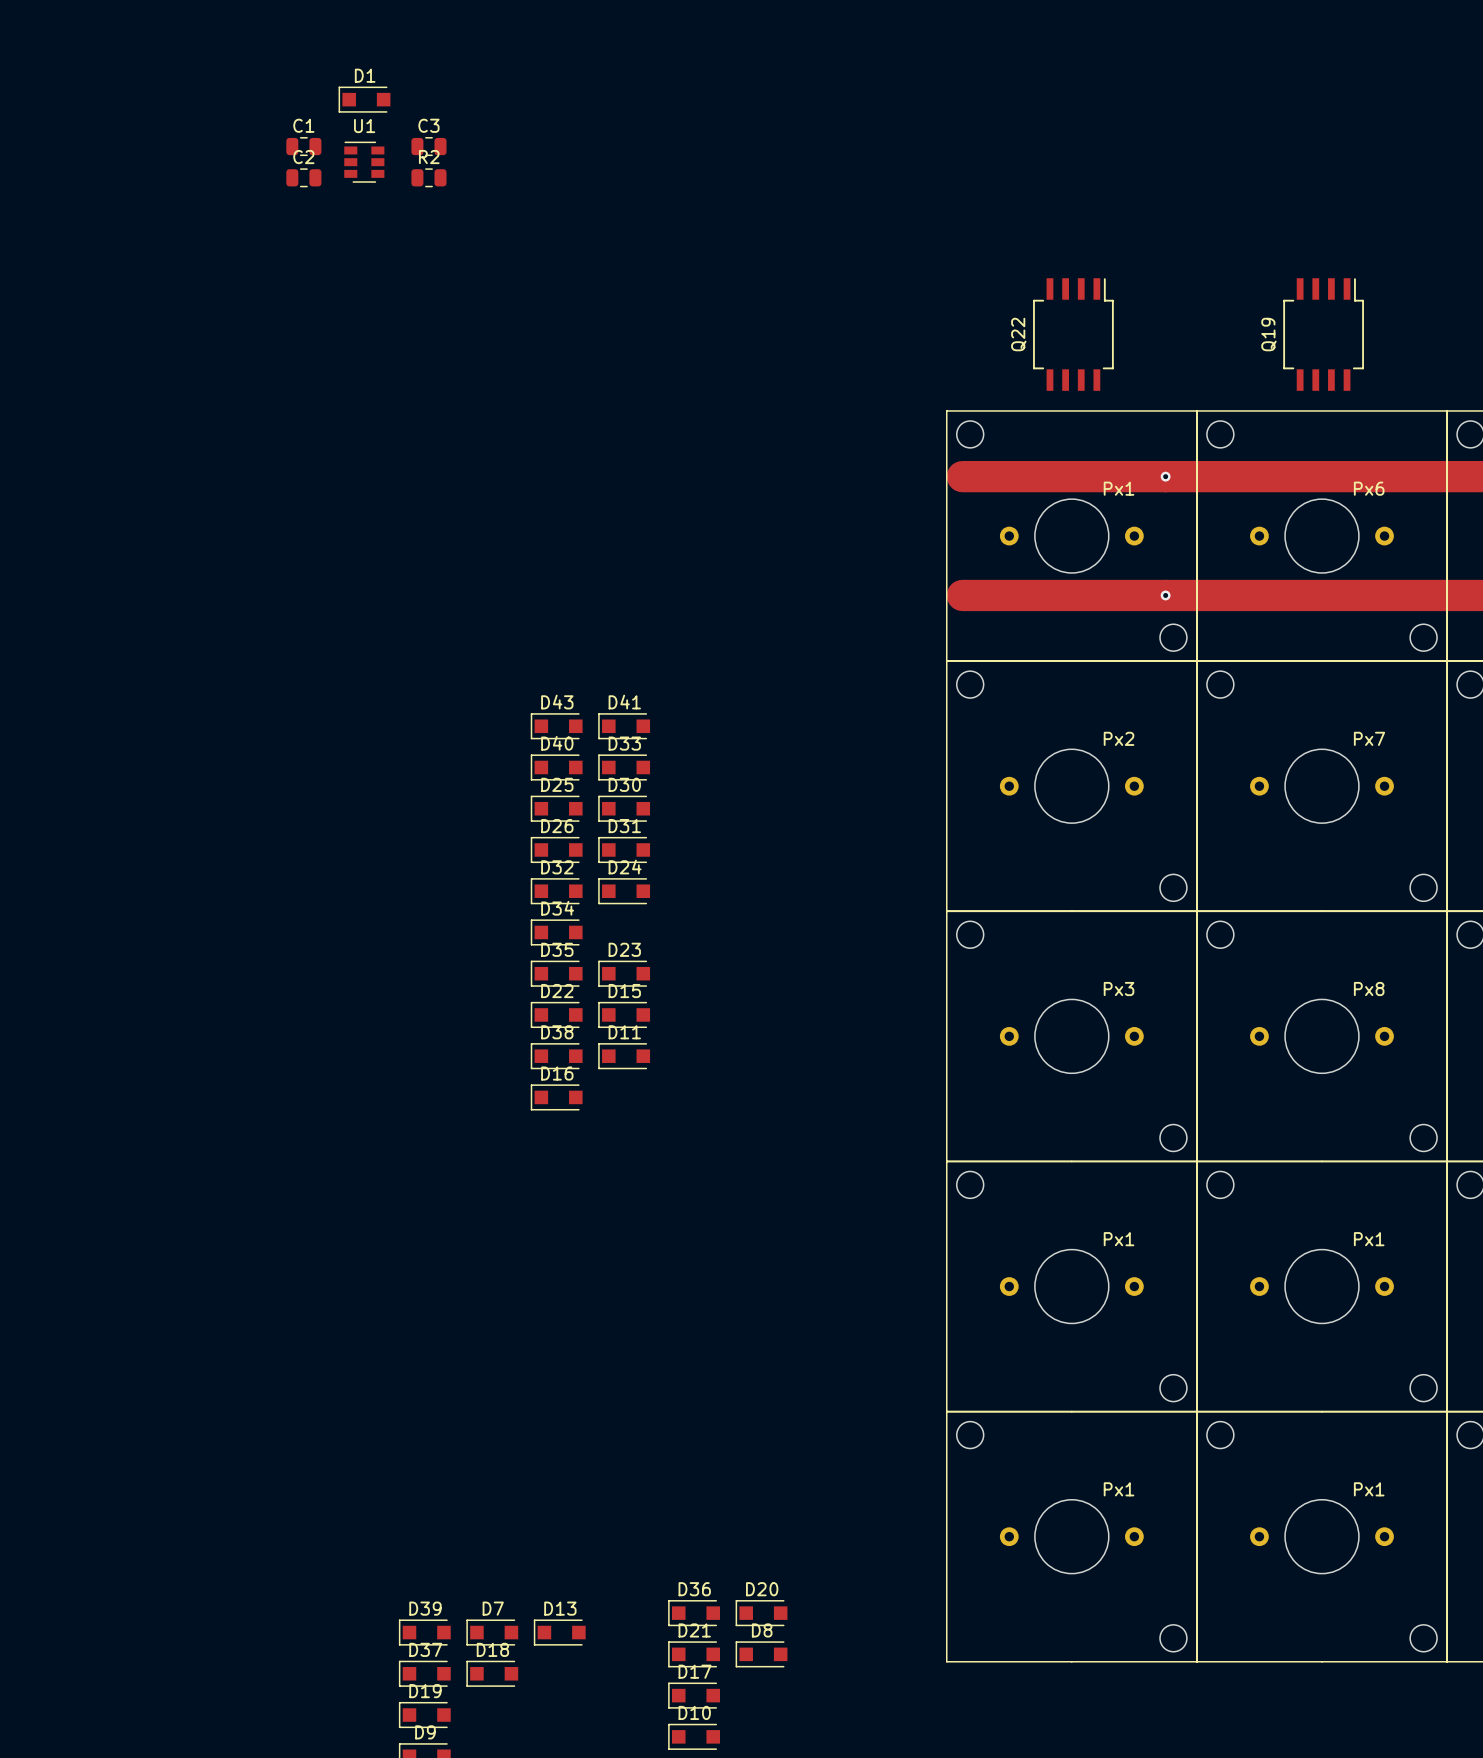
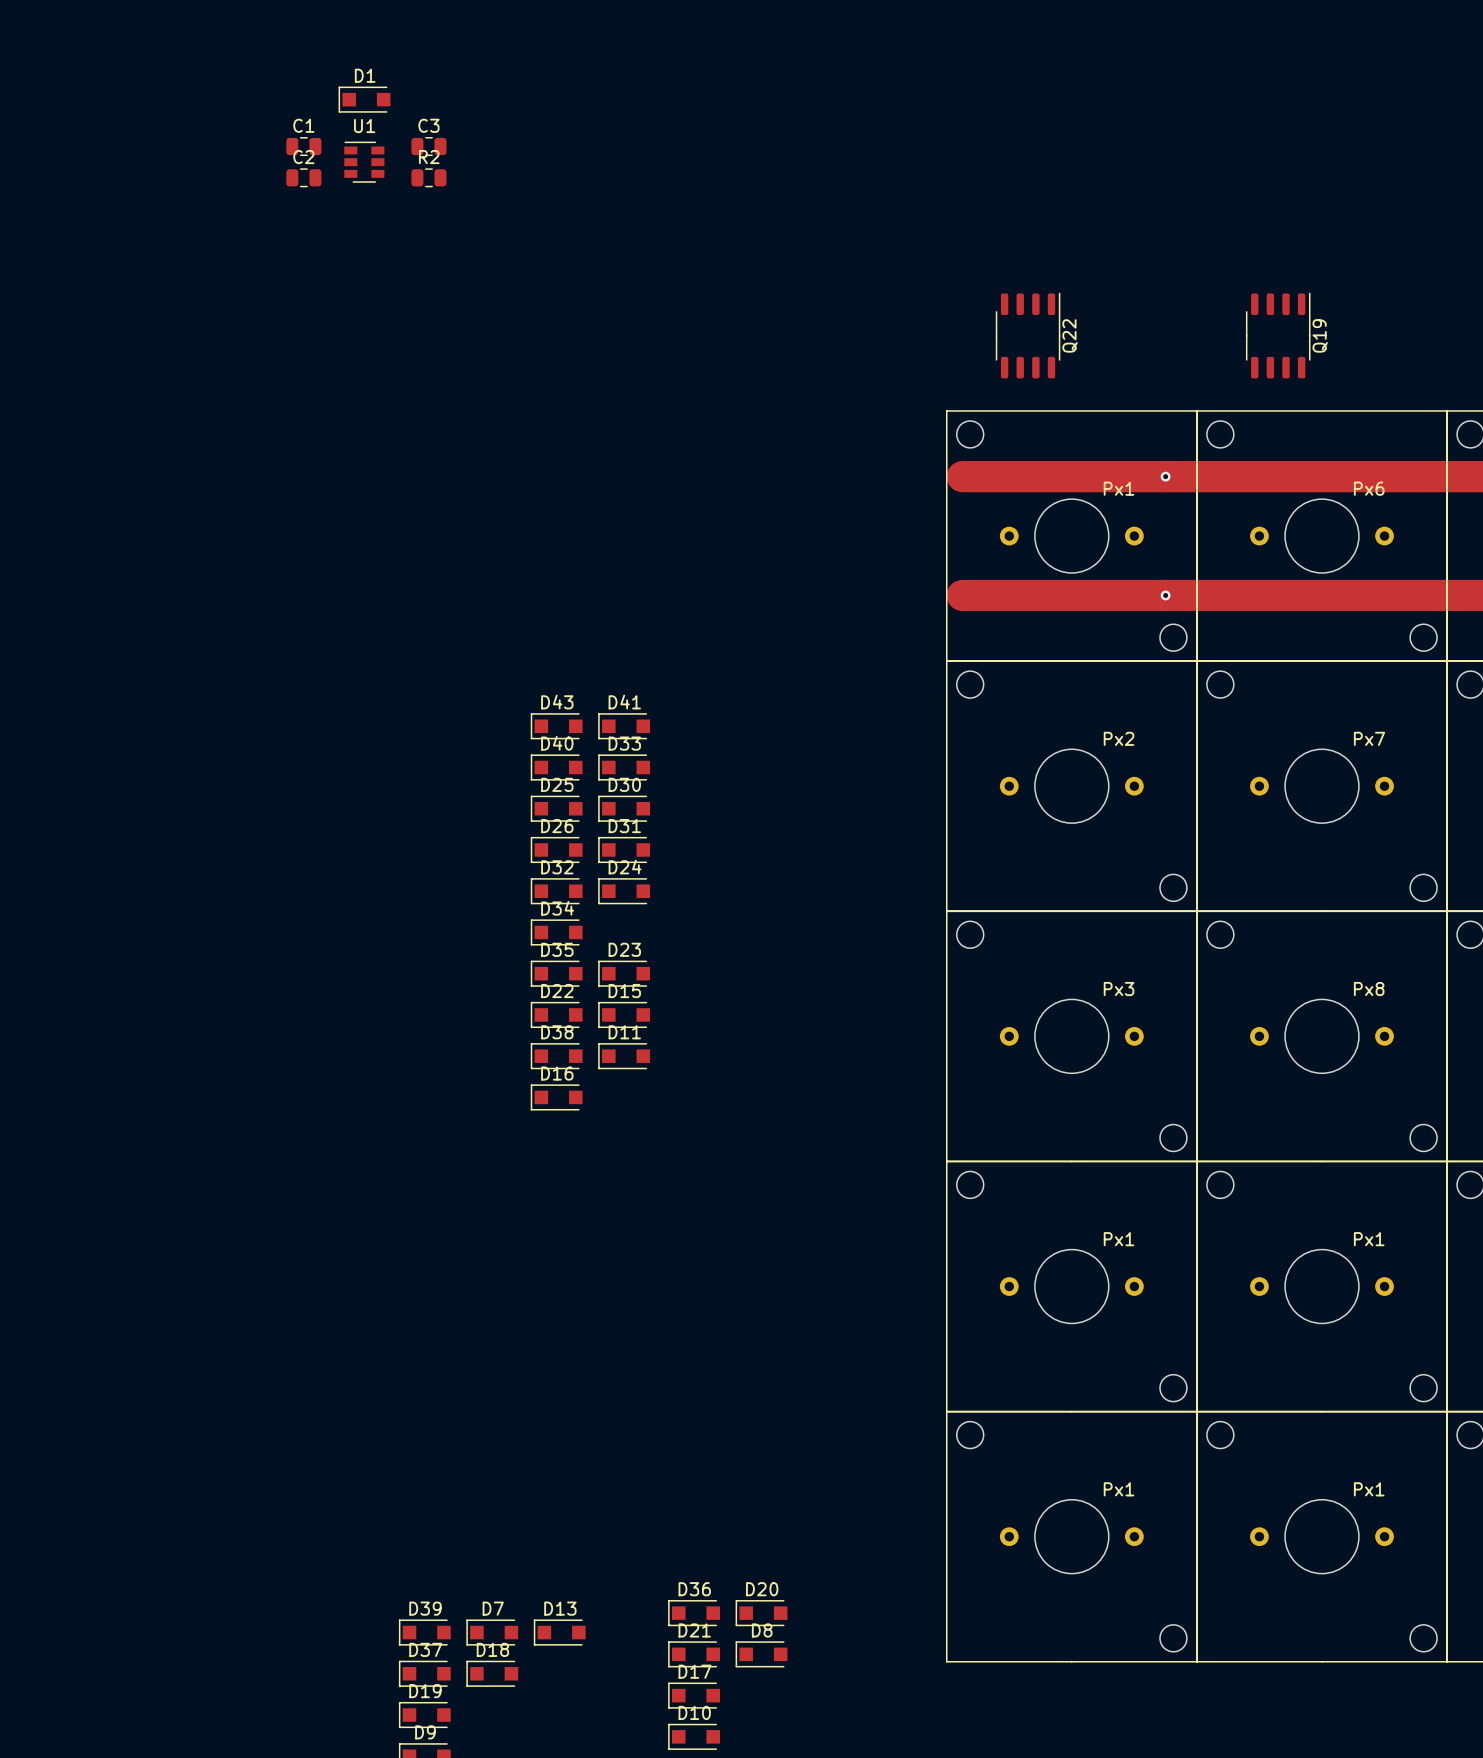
Q22 footprint: [1033, 278, 1114, 391] -> [995, 292, 1061, 379]
Q19 footprint: [1283, 278, 1364, 391] -> [1245, 292, 1311, 379]
Q22 name position: Q22 (1018, 334) -> Q22 (1070, 335)
Q19 name position: Q19 (1268, 334) -> Q19 (1320, 335)

